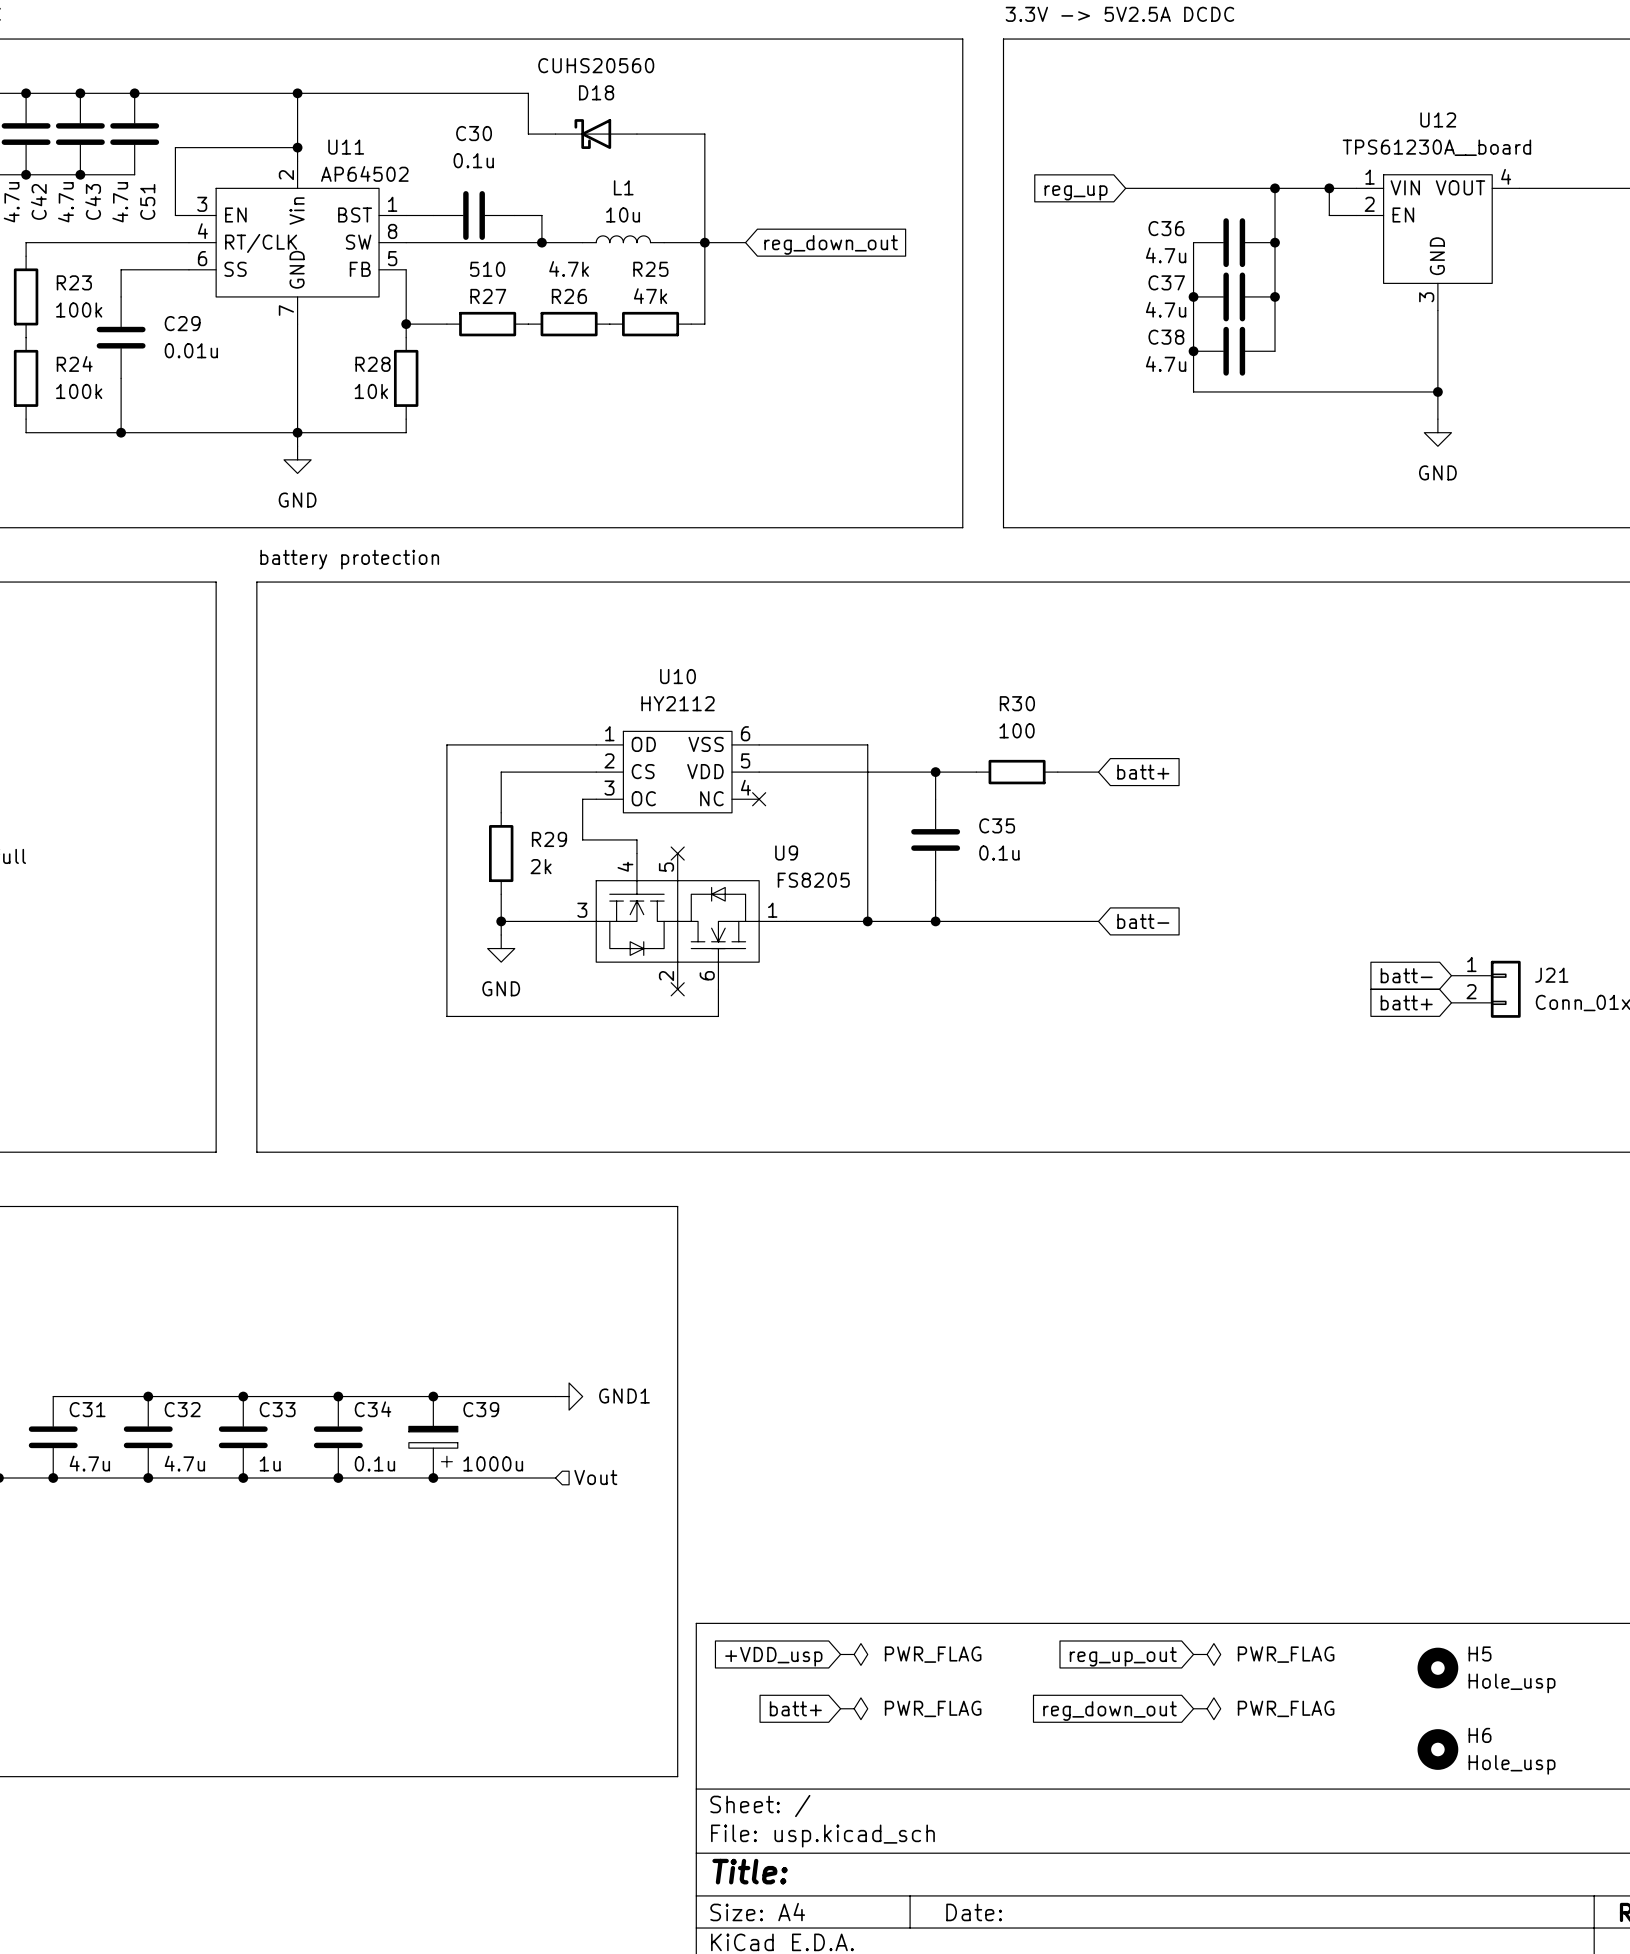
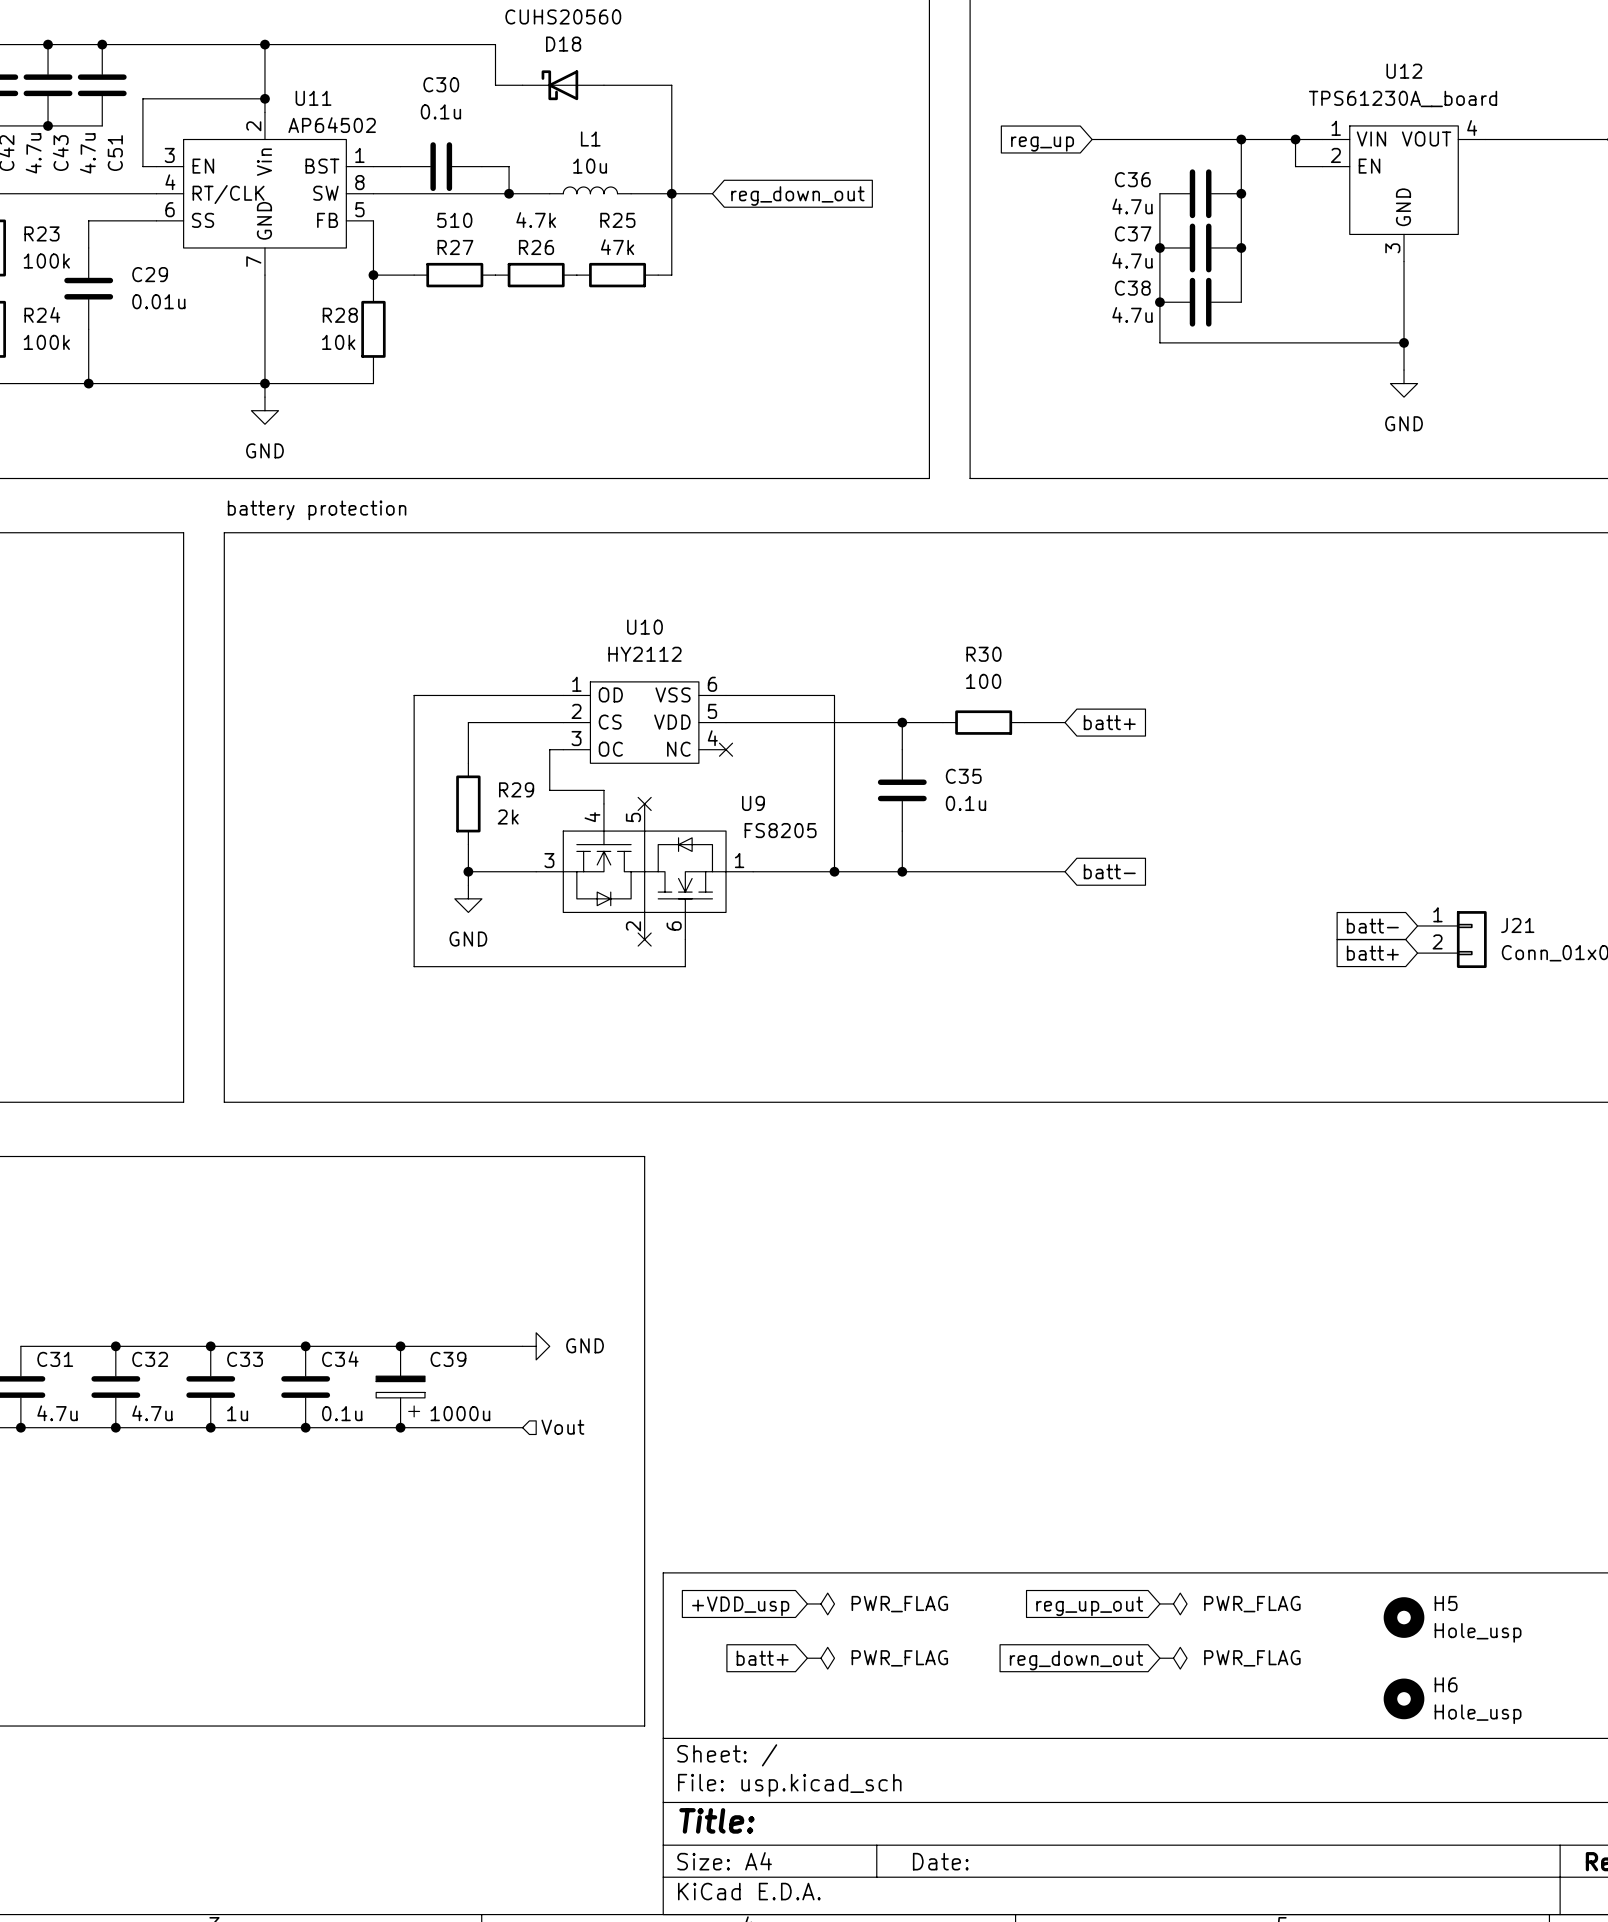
power symbol: GND1 (569, 1396) -> GND (536, 1346)

